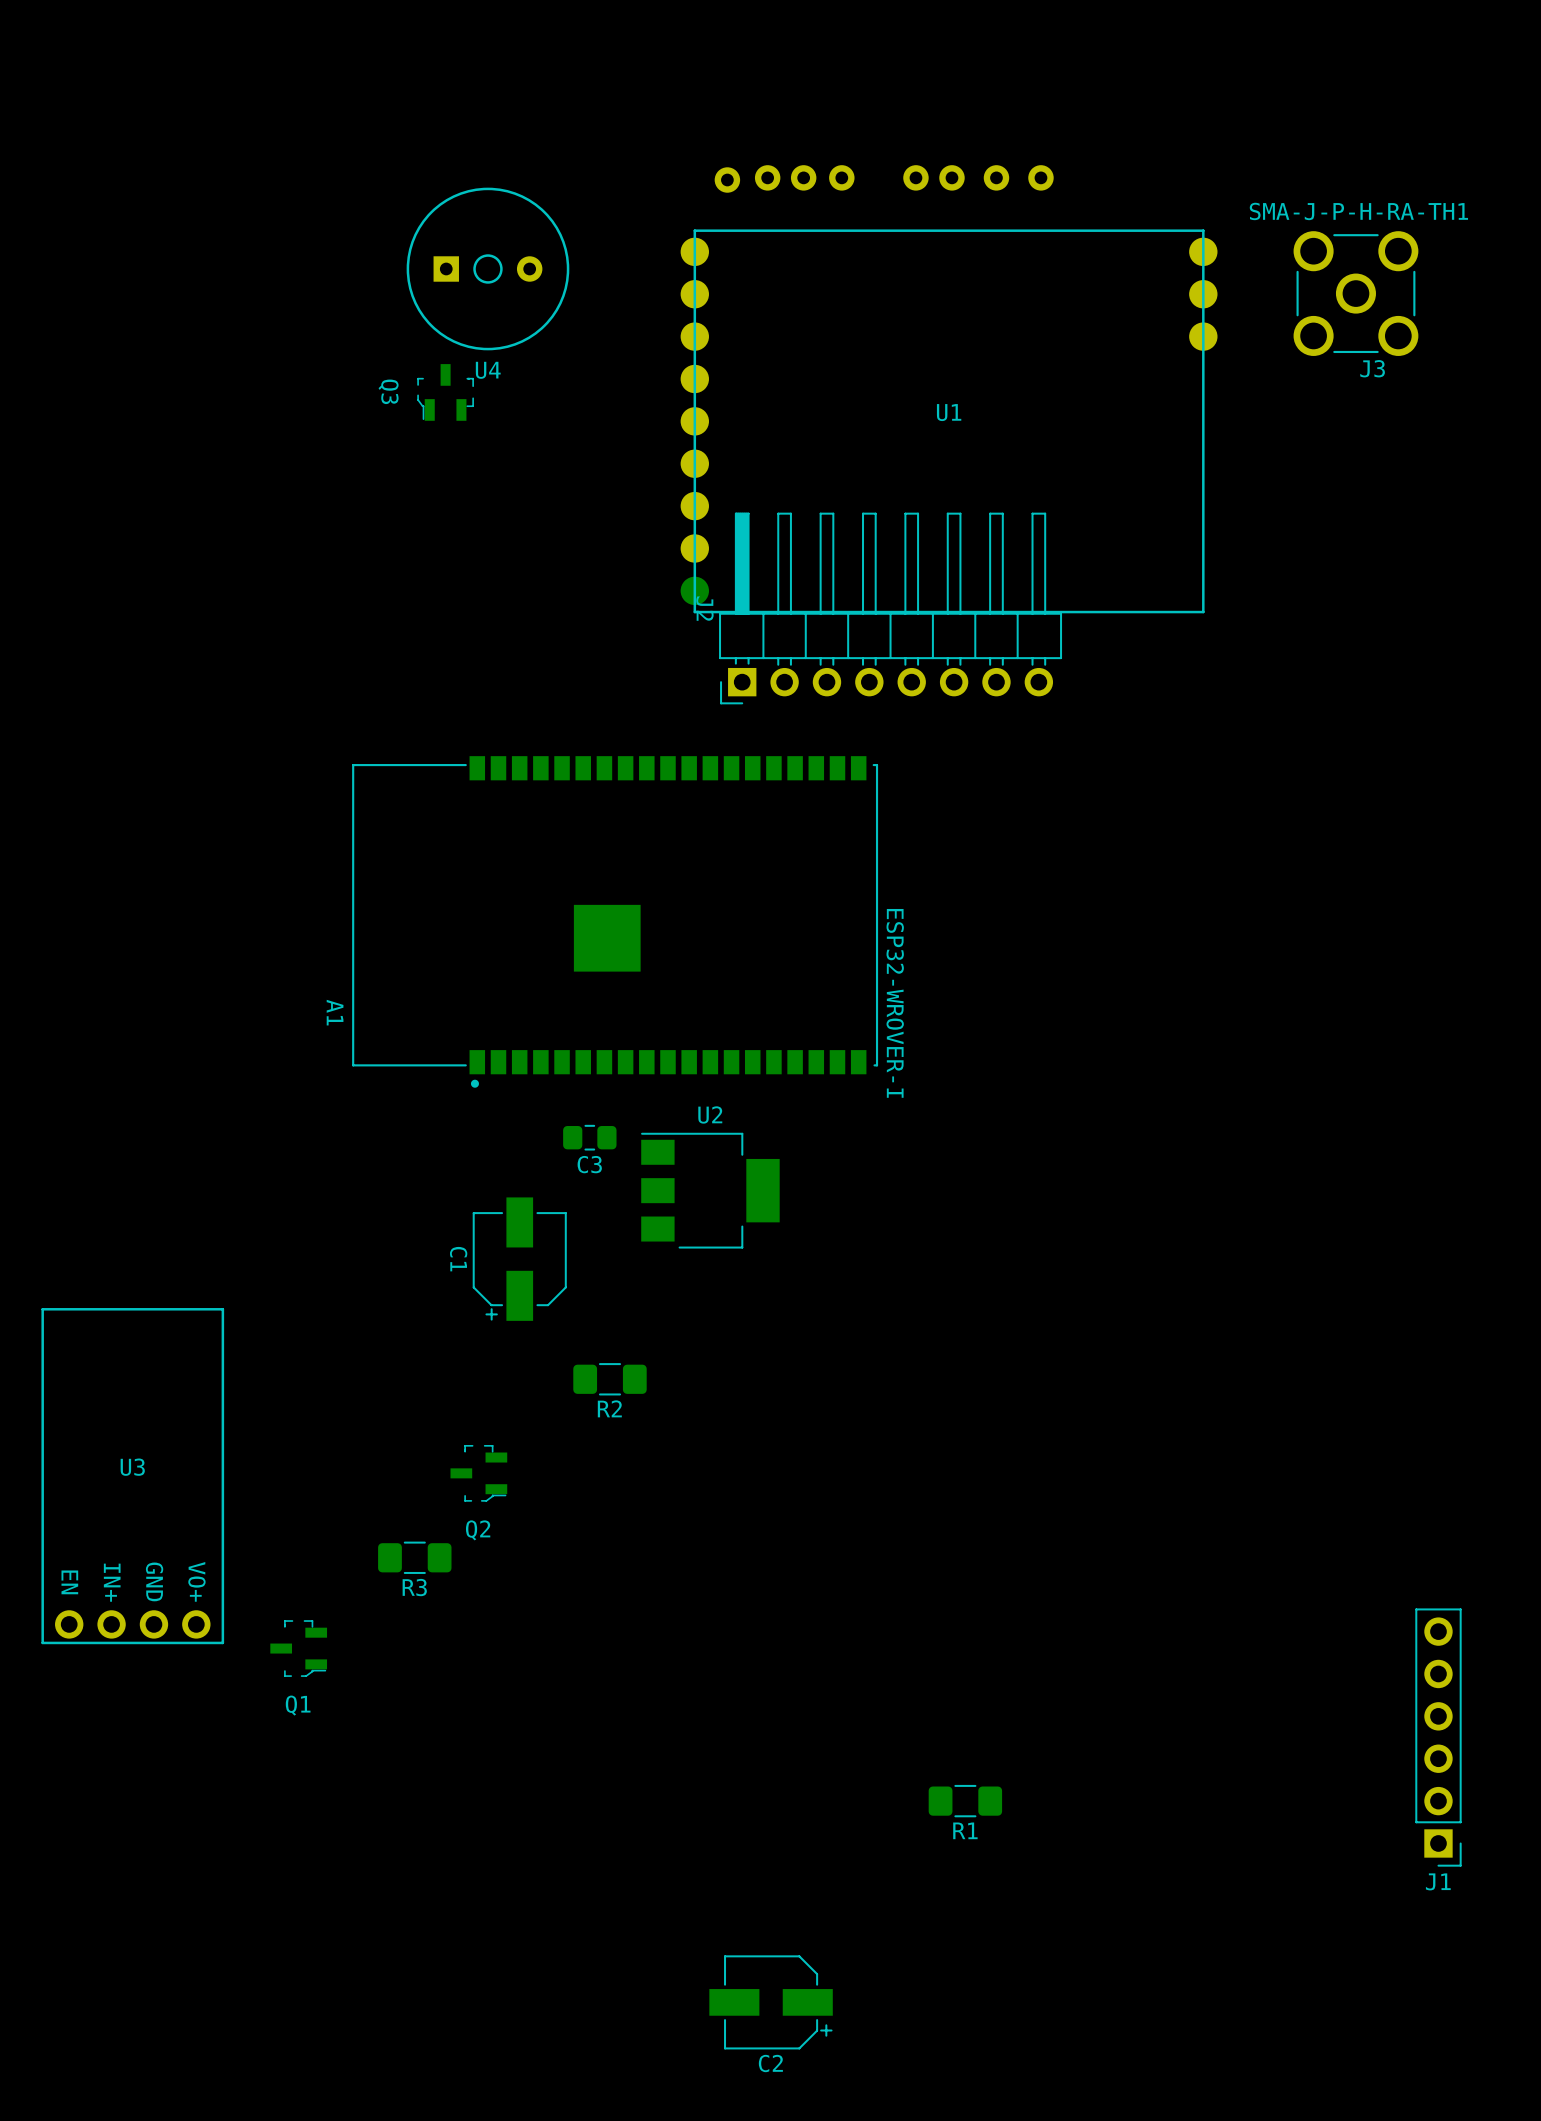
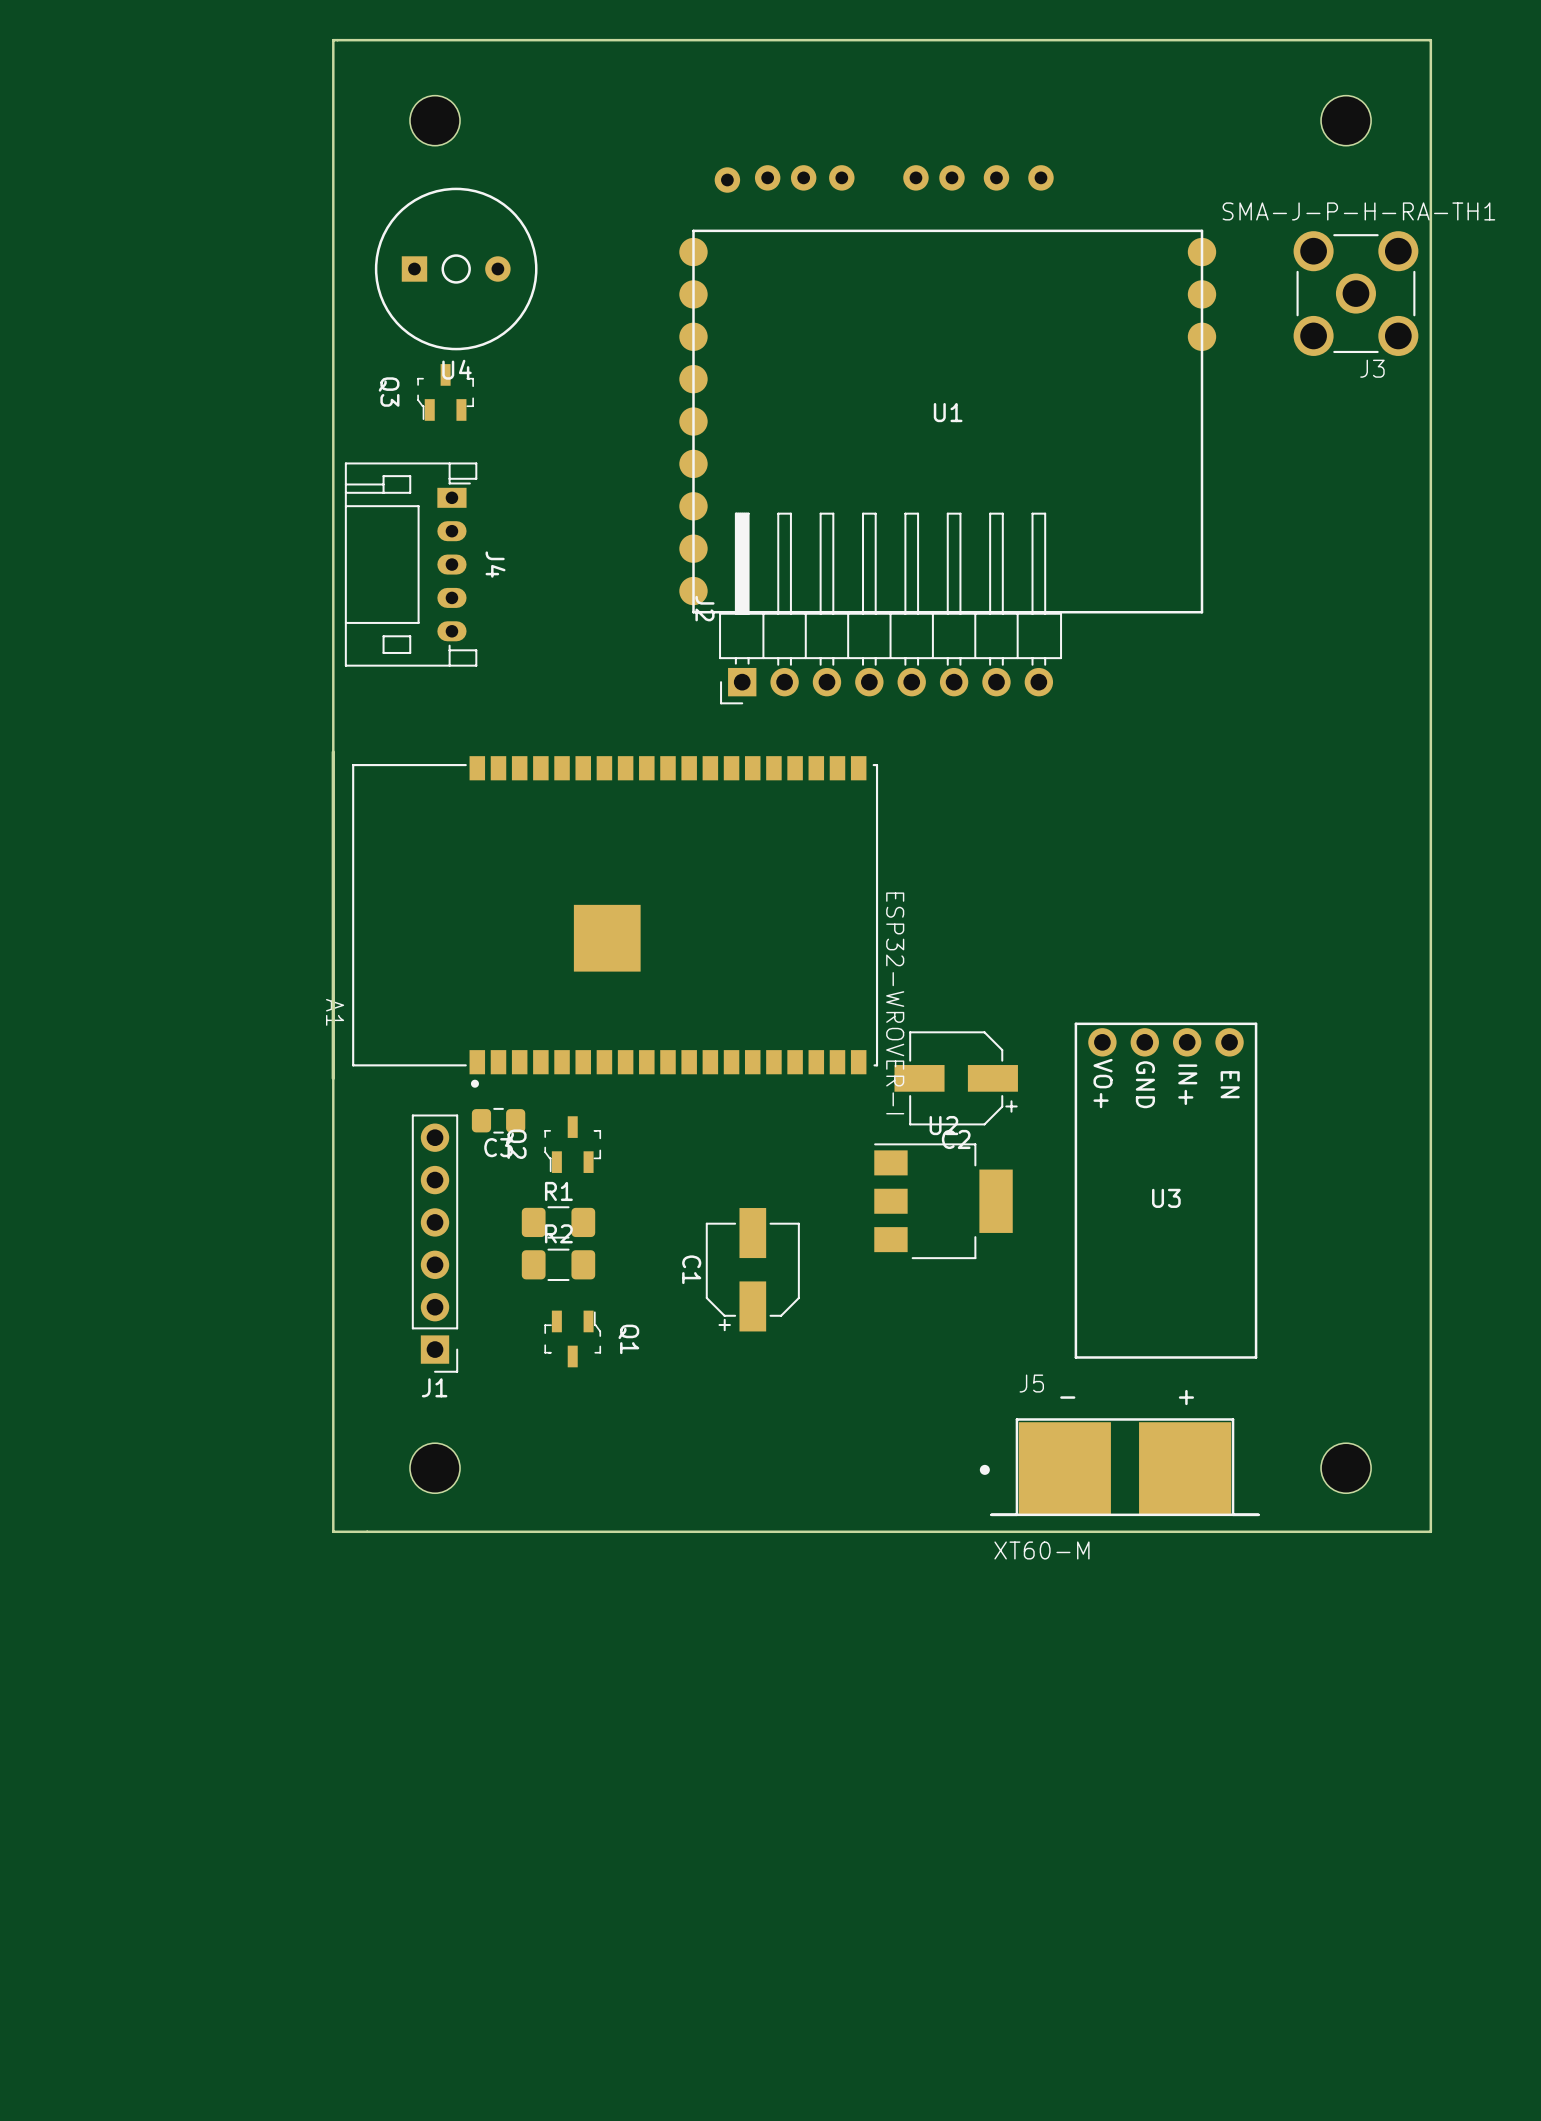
board edge: none -> (1430, 40) (333, 40) (333, 1531) (1430, 1531) (1430, 40)
part: none -> (435, 120)
part: none -> (1346, 120)
U1 footprint: [680, 229, 1218, 614] -> [679, 229, 1217, 614]
U4 position: (487, 268) -> (456, 268)
J4: none -> (411, 564)
C3 position: (589, 1137) -> (498, 1120)
U2 position: (710, 1190) -> (943, 1201)
C1 position: (519, 1259) -> (752, 1269)
R2 position: (609, 1379) -> (558, 1264)
R2 name position: R2 (609, 1408) -> R2 (558, 1233)
J5: none -> XT60-M (1119, 1467)
part: none -> (435, 1468)
part: none -> (1346, 1468)
Q2 rotation: 0° (478, 1473) -> 90° clockwise (572, 1144)
Q2 position: (478, 1473) -> (572, 1144)
U3 rotation: 0° (132, 1476) -> 180° (1165, 1190)
U3 position: (132, 1476) -> (1165, 1190)
R3: (414, 1557) -> none
Q1 rotation: 0° (298, 1648) -> 90° counterclockwise (572, 1338)
Q1 position: (298, 1648) -> (572, 1338)
J1 position: (1438, 1737) -> (435, 1243)
R1 position: (965, 1801) -> (558, 1222)
R1 name position: R1 (965, 1830) -> R1 (558, 1191)
C2 position: (771, 2002) -> (956, 1078)

